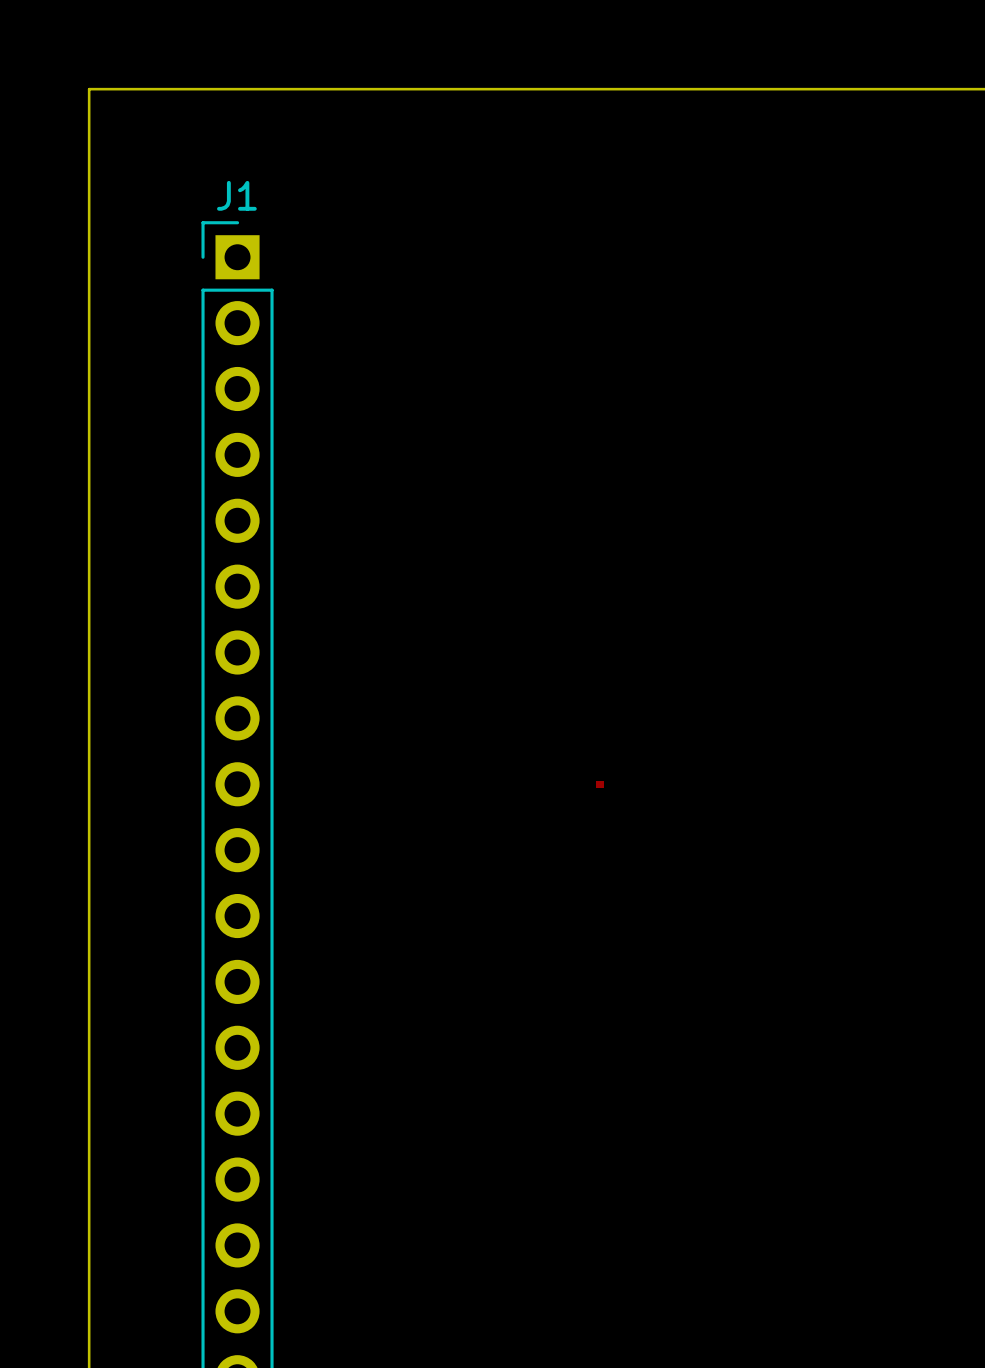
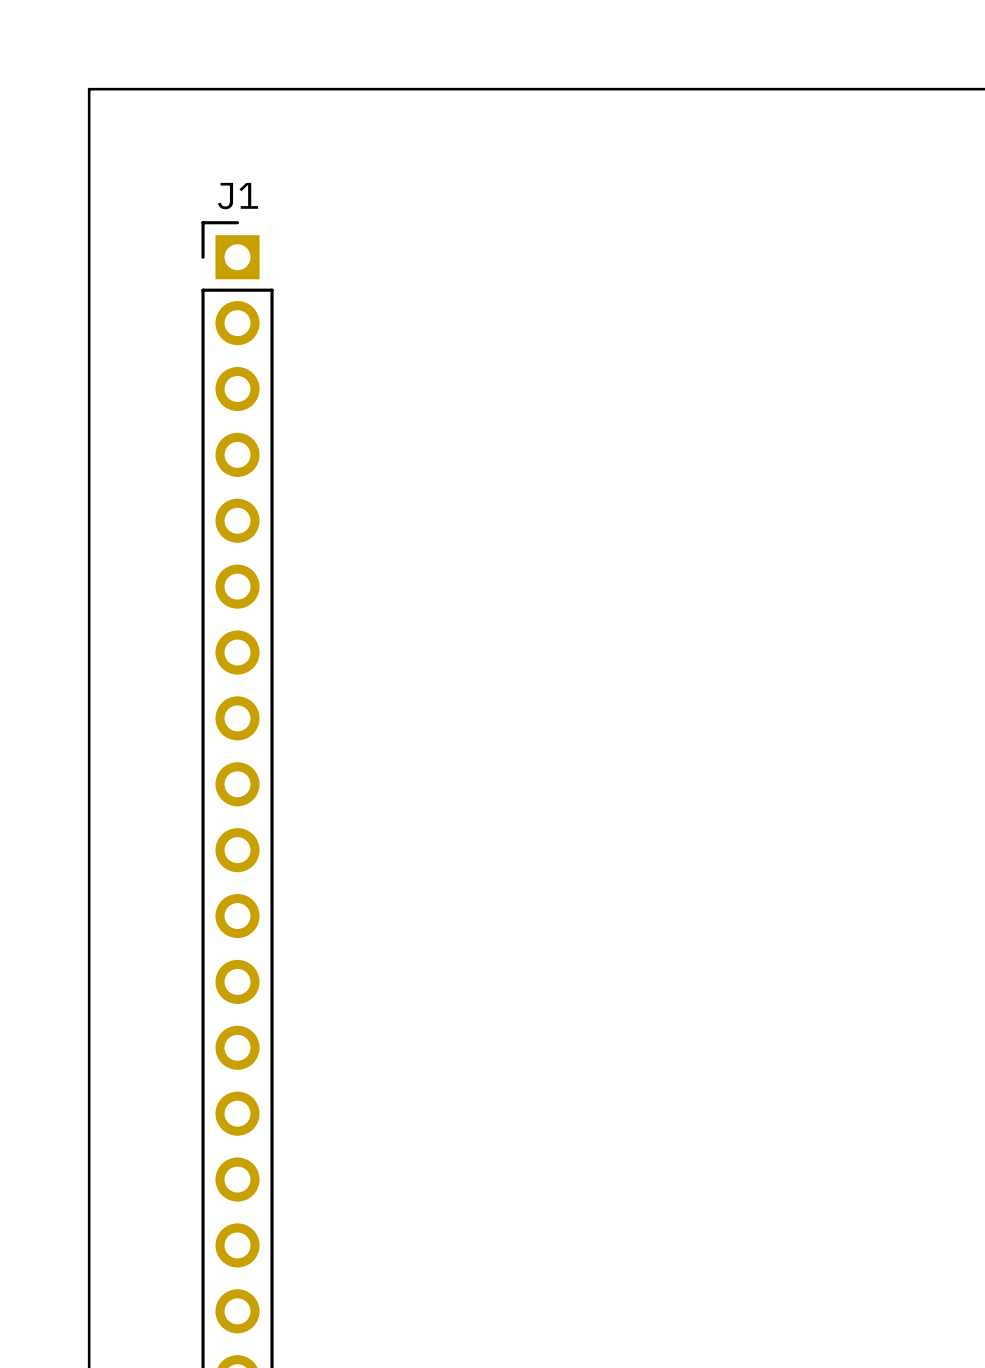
part: (599, 784) -> none

